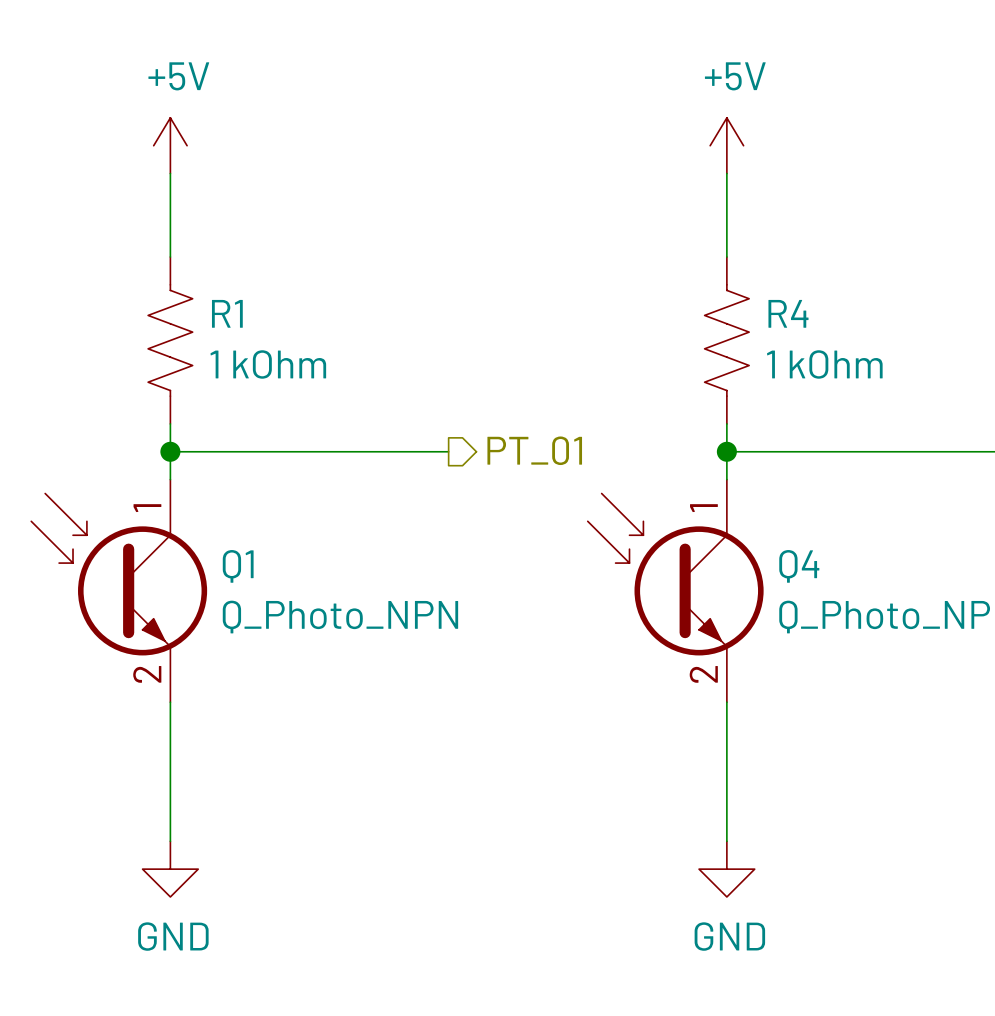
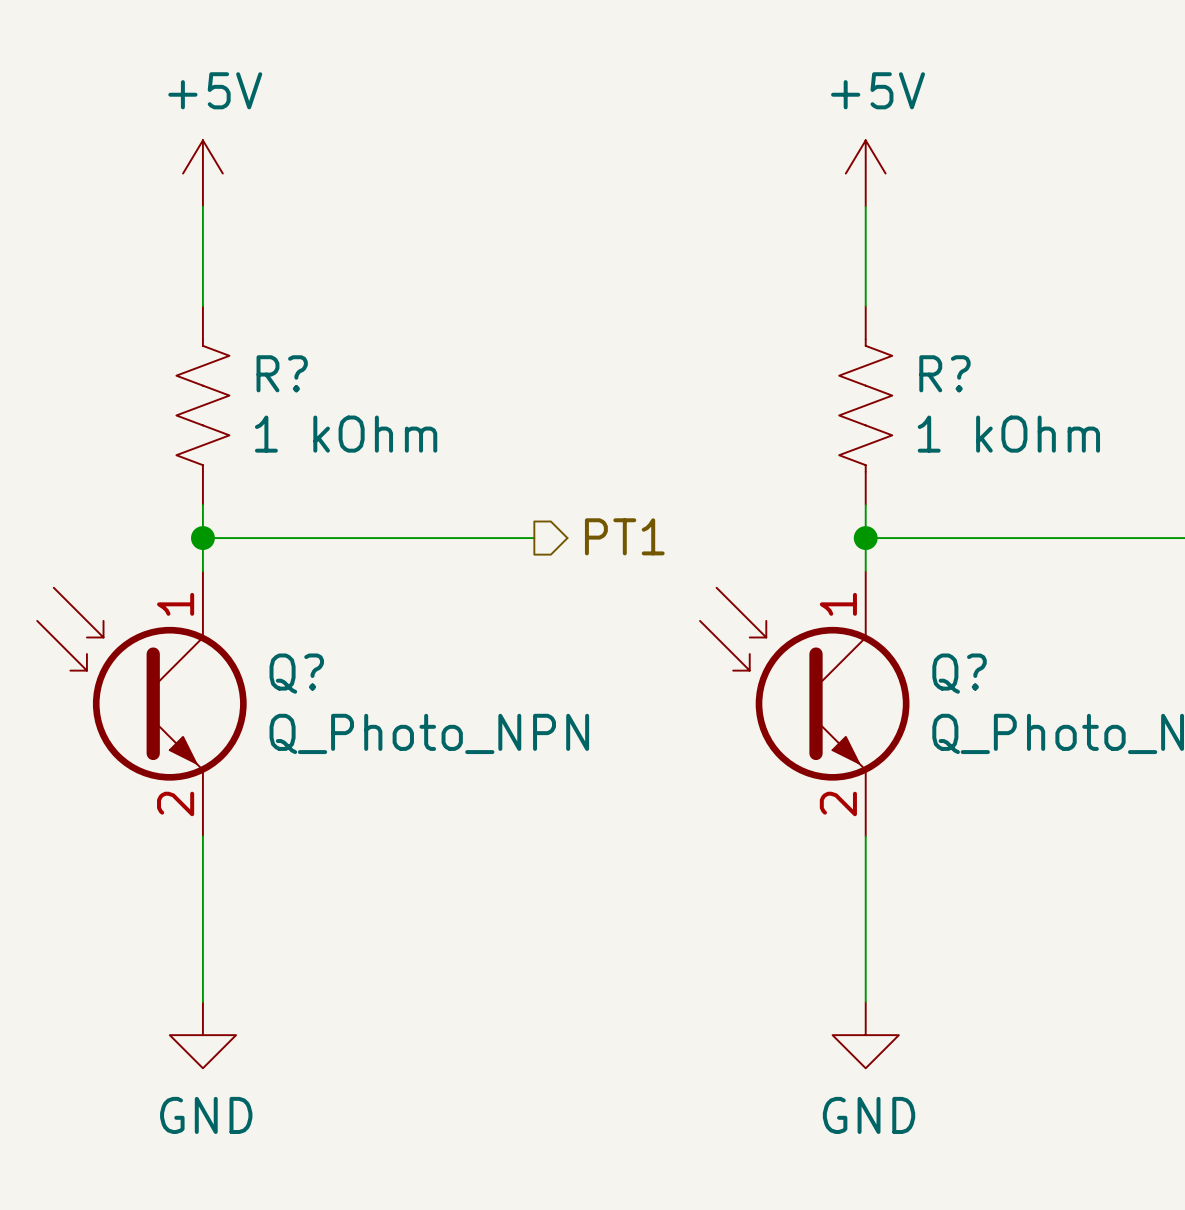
R1 name: R1 (227, 313) -> R? (282, 373)
R4 name: R4 (788, 313) -> R? (944, 373)
hierarchical label: PT_01 (534, 450) -> PT1 (624, 536)
Q1 name: Q1 (238, 566) -> Q? (296, 673)
Q4 name: Q4 (799, 566) -> Q? (959, 673)

